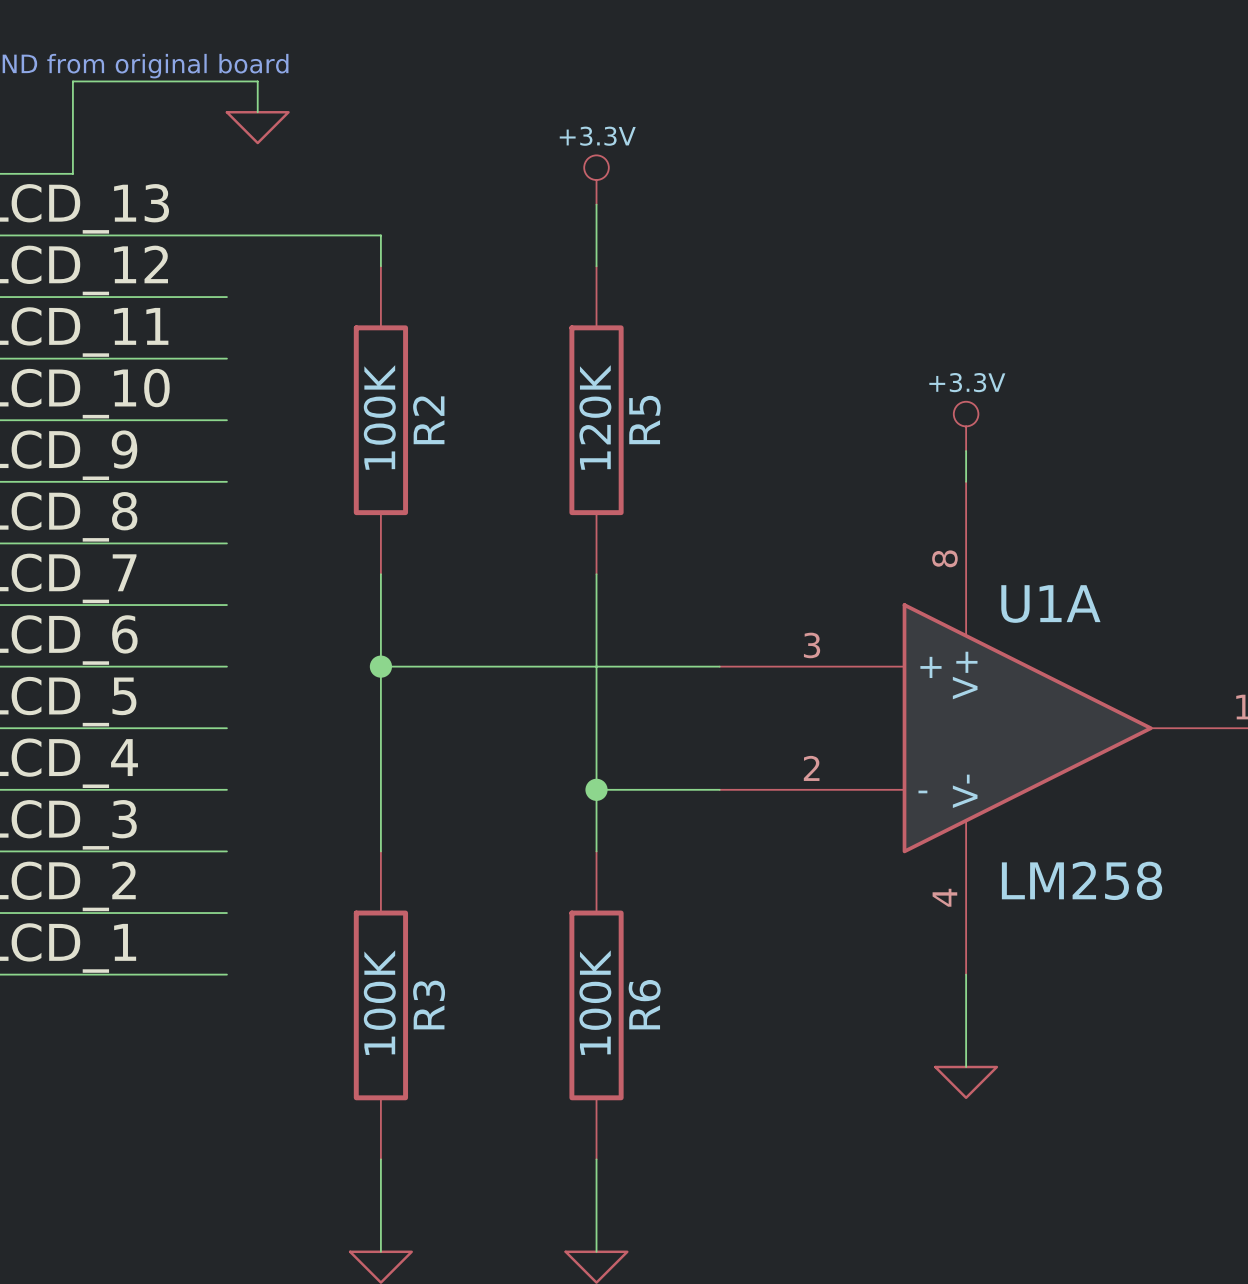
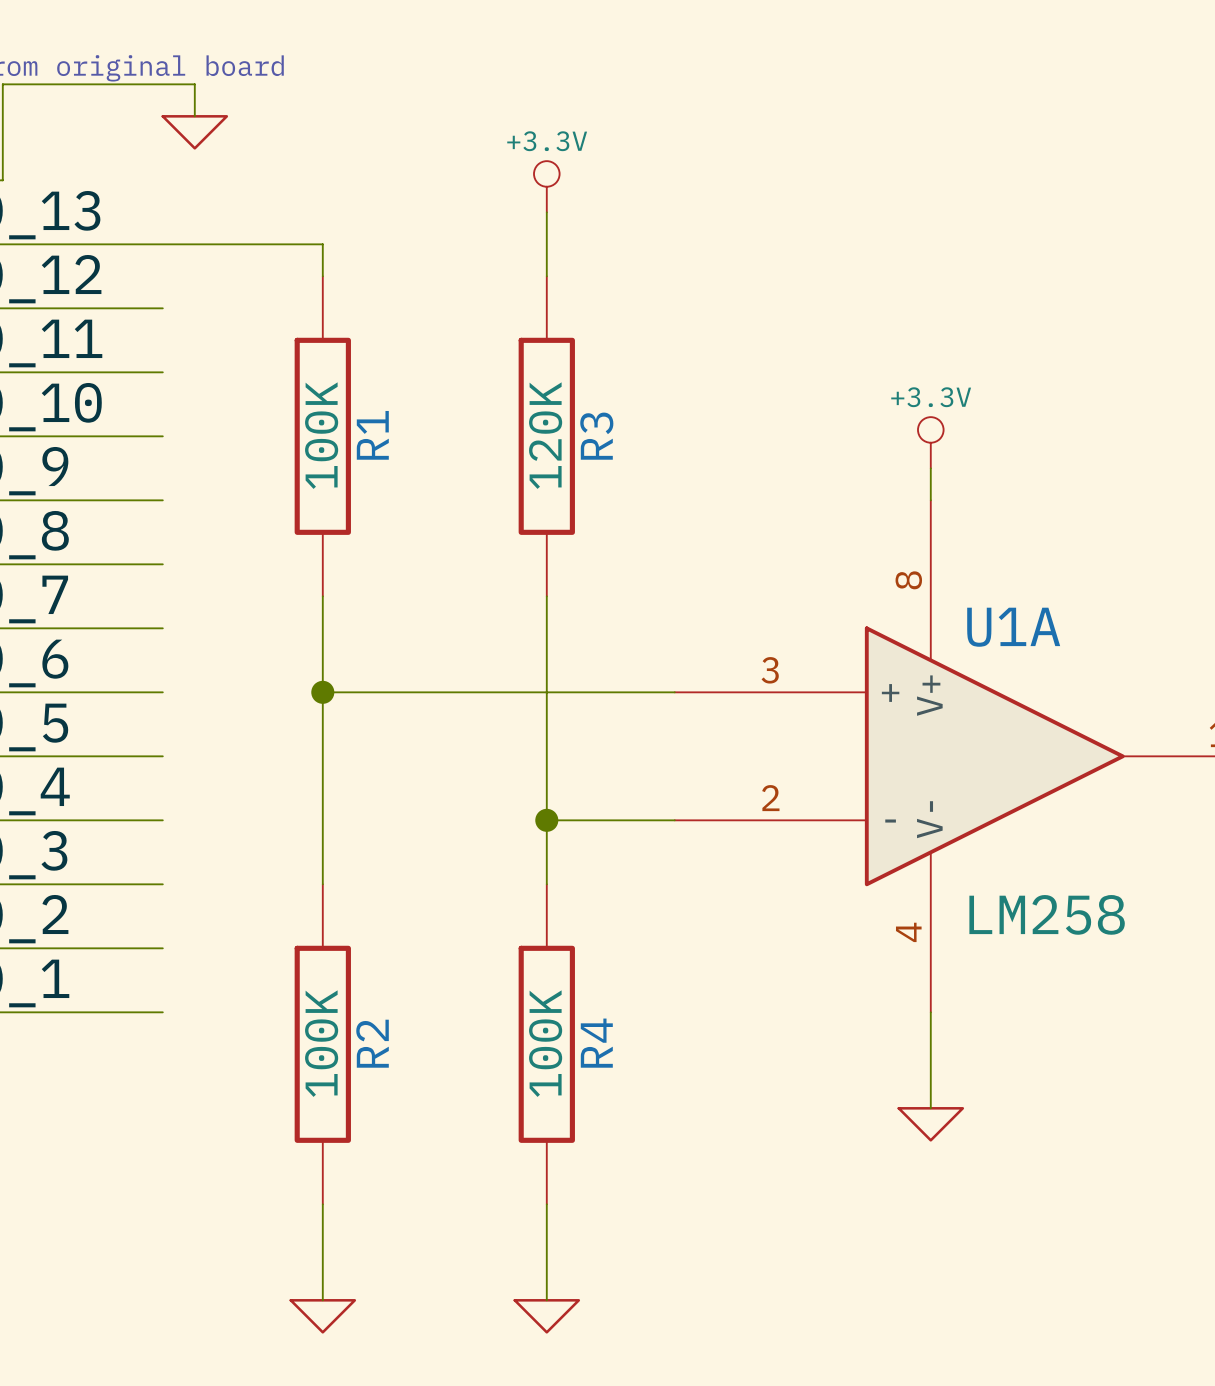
R2 name: R2 (428, 420) -> R1 (372, 435)
R5 name: R5 (644, 420) -> R3 (596, 436)
R6 name: R6 (644, 1004) -> R4 (596, 1043)
R3 name: R3 (429, 1005) -> R2 (372, 1043)

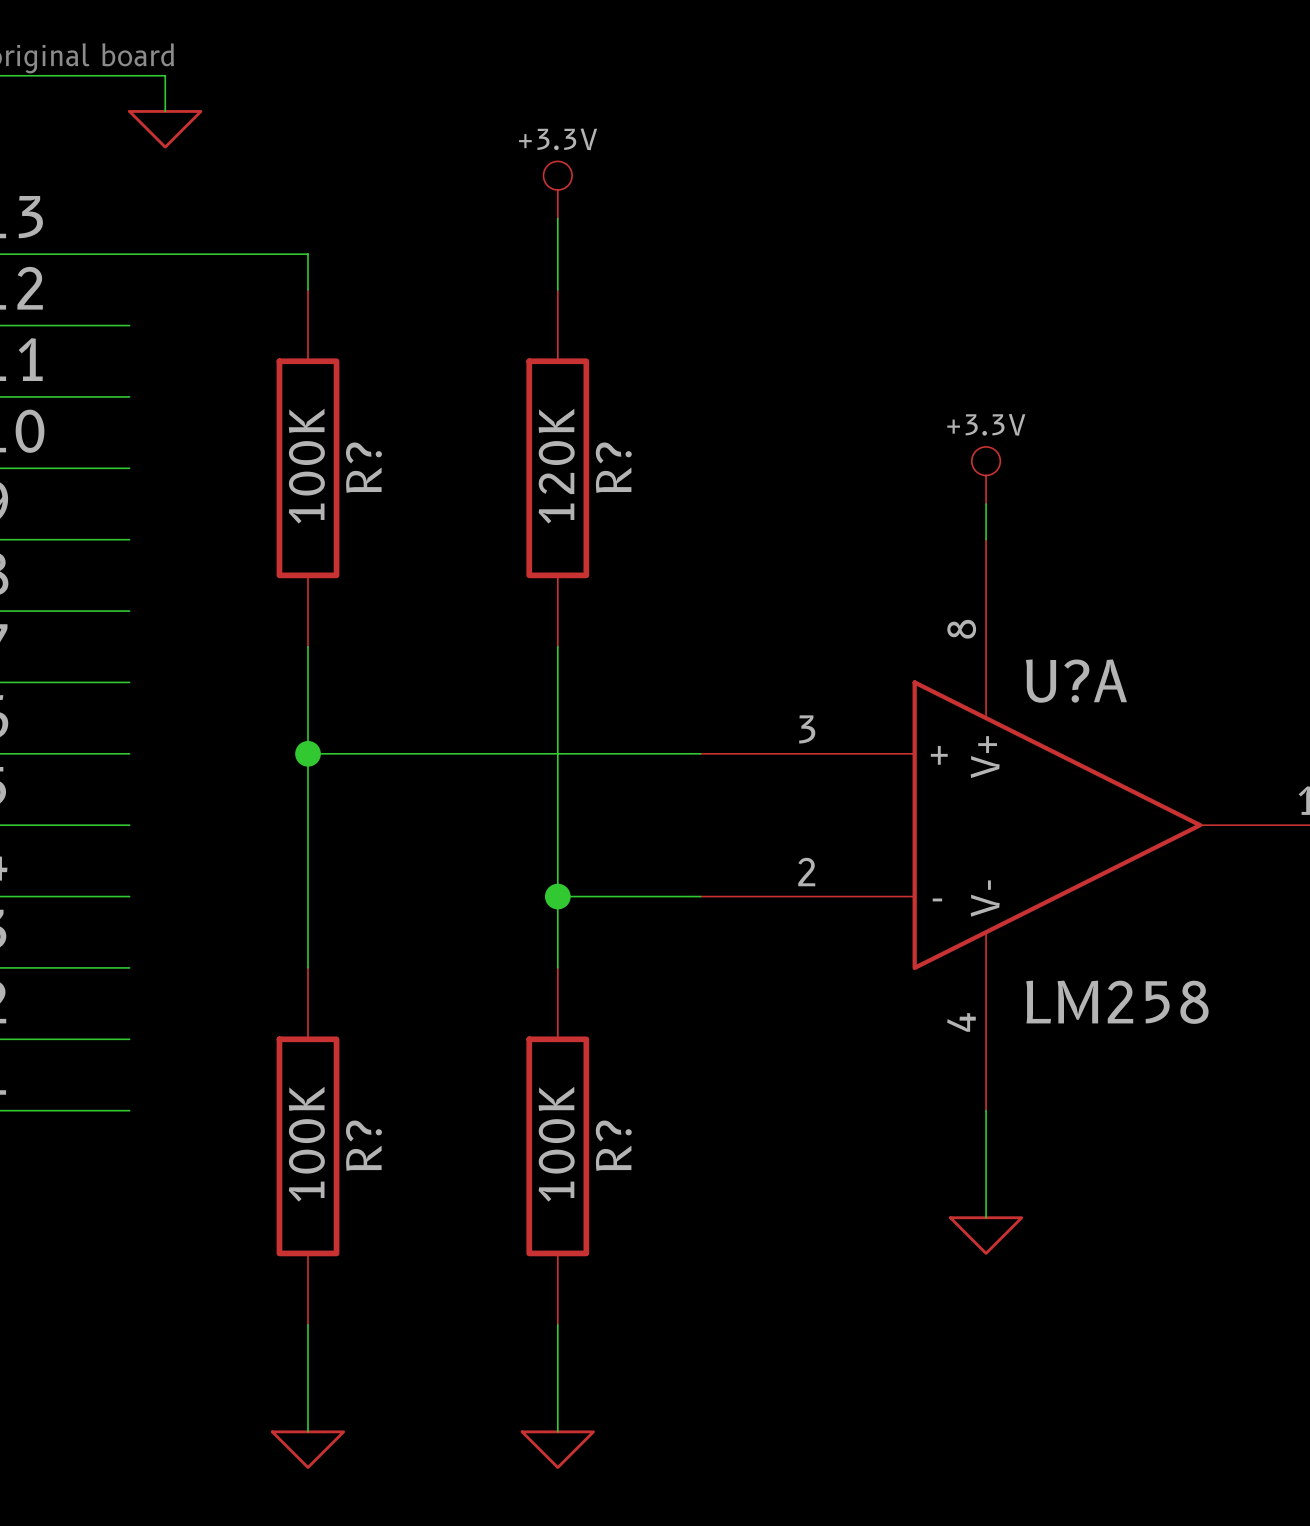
R1 name: R1 (372, 435) -> R? (363, 467)
R3 name: R3 (596, 436) -> R? (613, 467)
U1A name: U1A (1013, 627) -> U?A (1076, 681)
R2 name: R2 (372, 1043) -> R? (363, 1145)
R4 name: R4 (596, 1043) -> R? (613, 1145)

